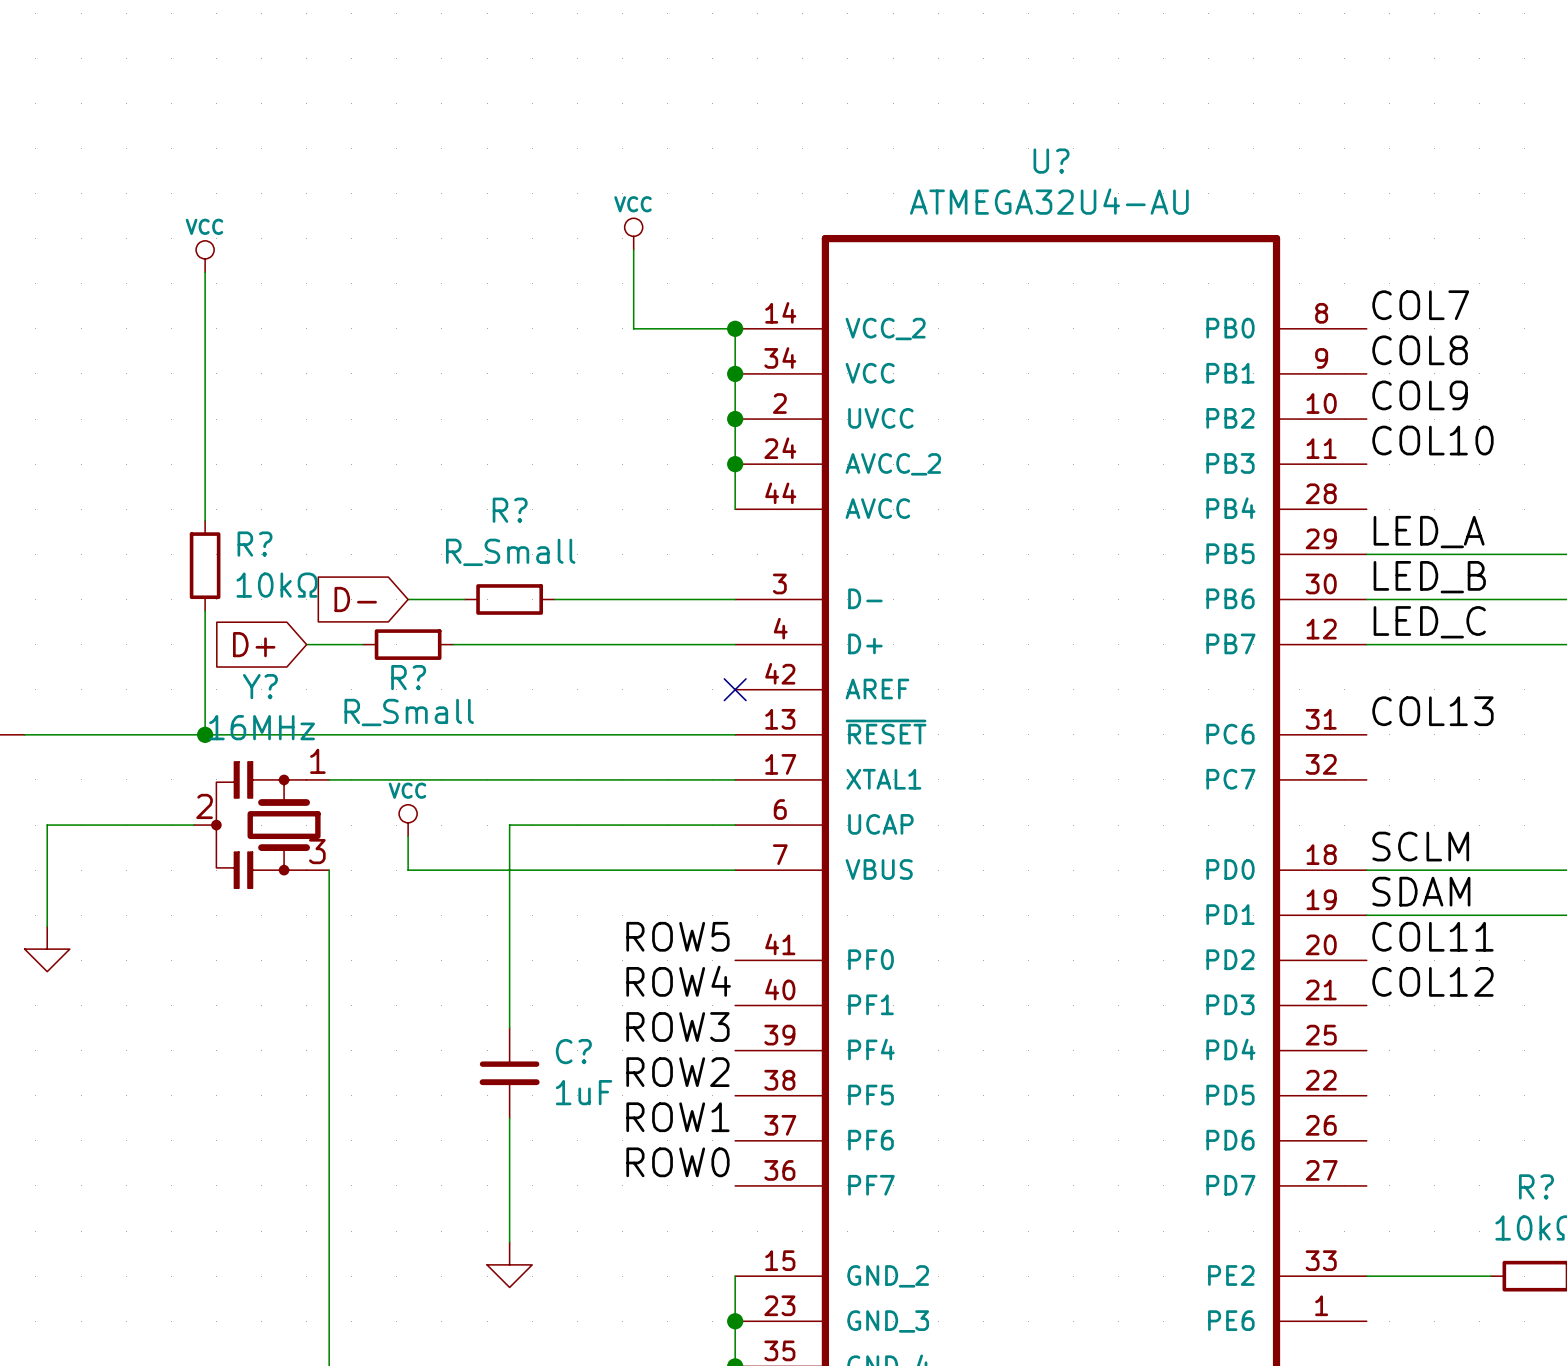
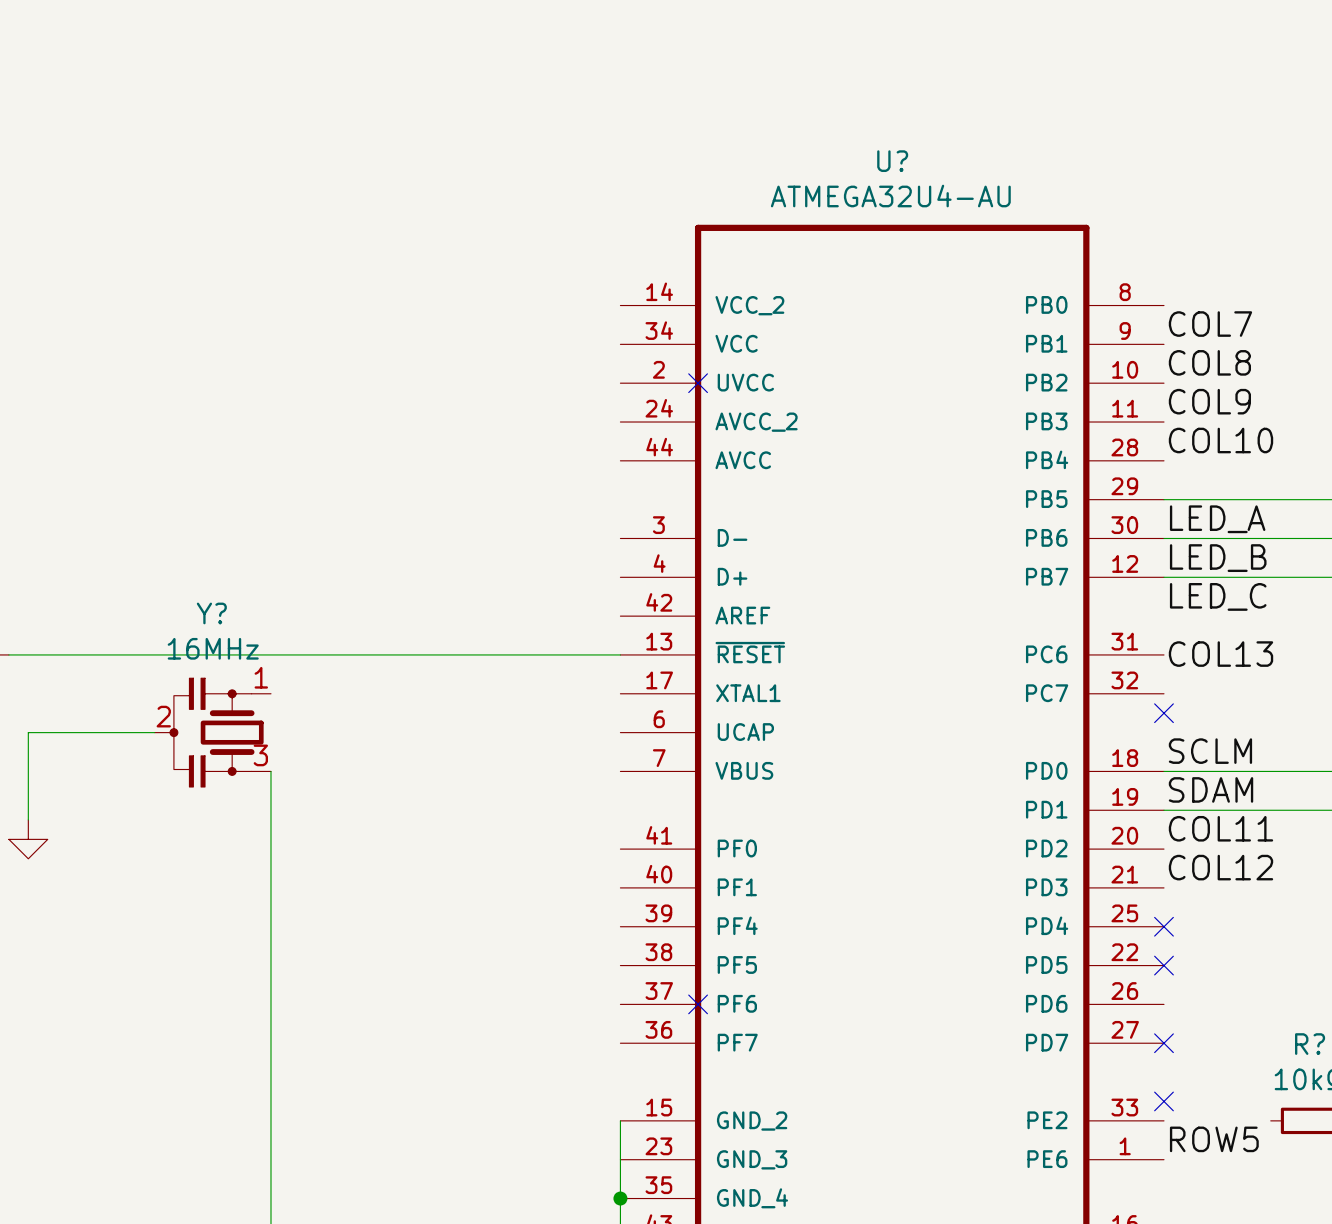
power symbol: VCC (633, 234) -> none
wire: (633, 249) (633, 328) (735, 328) (735, 509) -> none
power symbol: VCC (205, 256) -> none
wire: (205, 272) (205, 520) -> none
label: COL7 (1420, 305) -> none
junction: (735, 328) -> none
label: COL8 (1420, 350) -> COL7 (1210, 324)
junction: (735, 373) -> none
label: COL9 (1420, 395) -> COL8 (1209, 362)
junction: (735, 419) -> none
no-connect mark: none -> (698, 383)
label: COL10 (1432, 440) -> COL9 (1209, 401)
junction: (735, 464) -> none
label: none -> COL10 (1220, 440)
label: LED_A (1429, 532) -> none
R?: 10kΩ (205, 565) -> none
label: LED_B (1429, 577) -> LED_A (1217, 519)
global label: D- (355, 599) -> none
wire: (408, 599) (464, 599) -> none
R?: R_Small (509, 599) -> none
wire: (554, 599) (735, 599) -> none
wire: (205, 610) (205, 734) -> none
label: LED_C (1429, 622) -> LED_B (1218, 558)
global label: D+ (254, 644) -> none
wire: (306, 644) (363, 644) -> none
R?: R_Small (408, 644) -> none
wire: (453, 644) (735, 644) -> none
label: none -> LED_C (1218, 596)
no-connect mark: (735, 689) -> none
label position: COL13 (1432, 711) -> COL13 (1220, 654)
junction: (205, 734) -> none
wire: (329, 779) (735, 779) -> none
no-connect mark: none -> (1163, 713)
power symbol: VCC (408, 820) -> none
wire: (735, 825) (509, 825) (509, 1028) -> none
wire: (408, 836) (408, 870) (735, 870) -> none
label: ROW5 (677, 936) -> none
label: ROW4 (678, 981) -> none
label: ROW3 (677, 1027) -> none
no-connect mark: none -> (1163, 926)
label: ROW2 (677, 1072) -> none
C?: 1uF (509, 1073) -> none
no-connect mark: none -> (1163, 965)
label: ROW1 (677, 1117) -> none
wire: (509, 1118) (509, 1242) -> none
no-connect mark: none -> (698, 1004)
label: ROW0 (677, 1162) -> none
no-connect mark: none -> (1163, 1043)
no-connect mark: none -> (1163, 1101)
power symbol: (509, 1264) -> none
wire: (1366, 1276) (1490, 1276) -> none
label: none -> ROW5 (1214, 1139)
junction: (735, 1321) -> none

